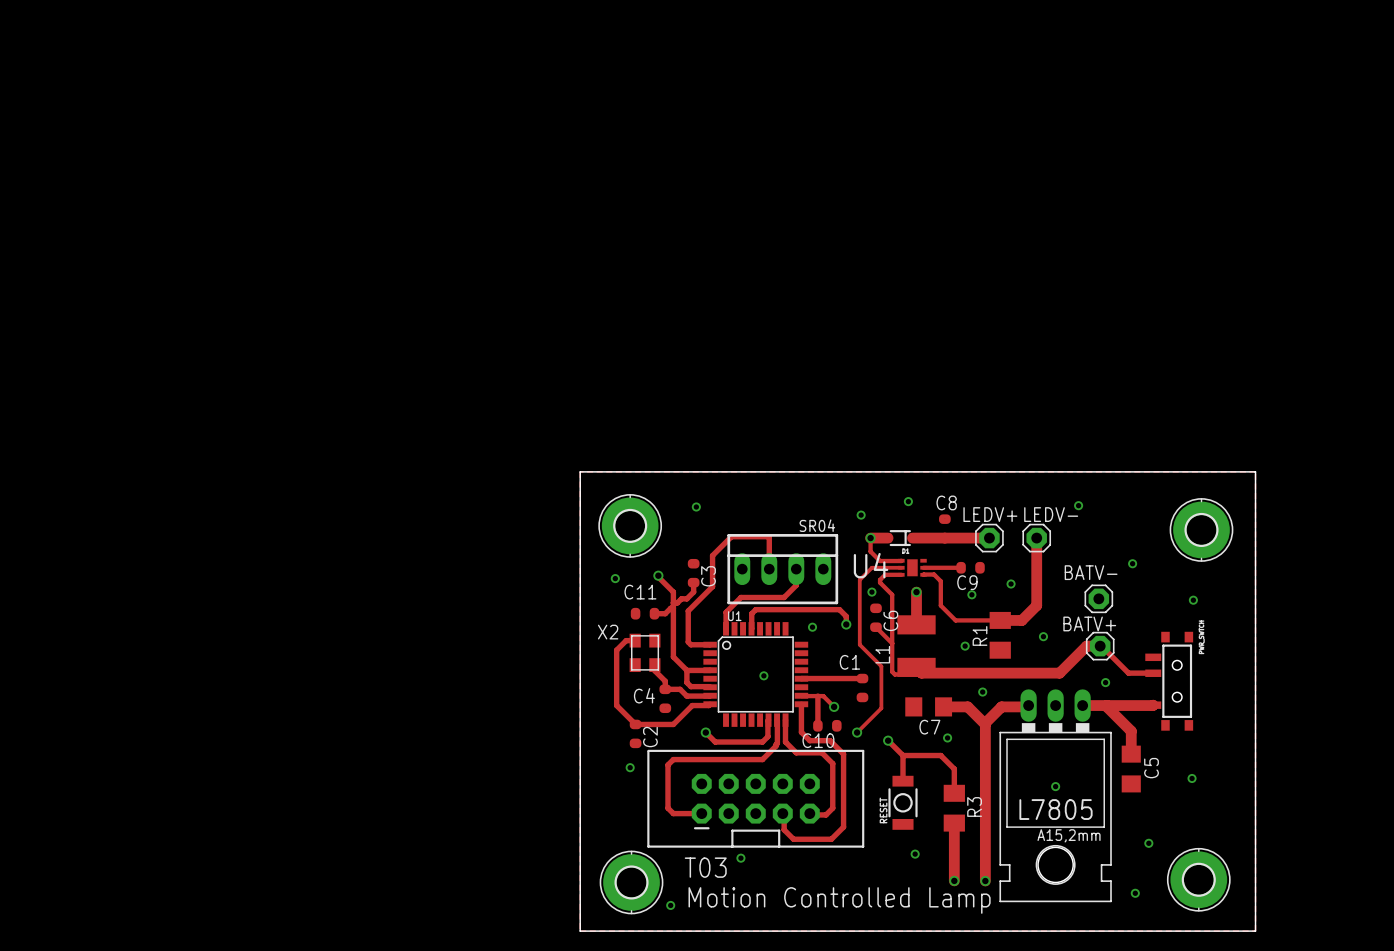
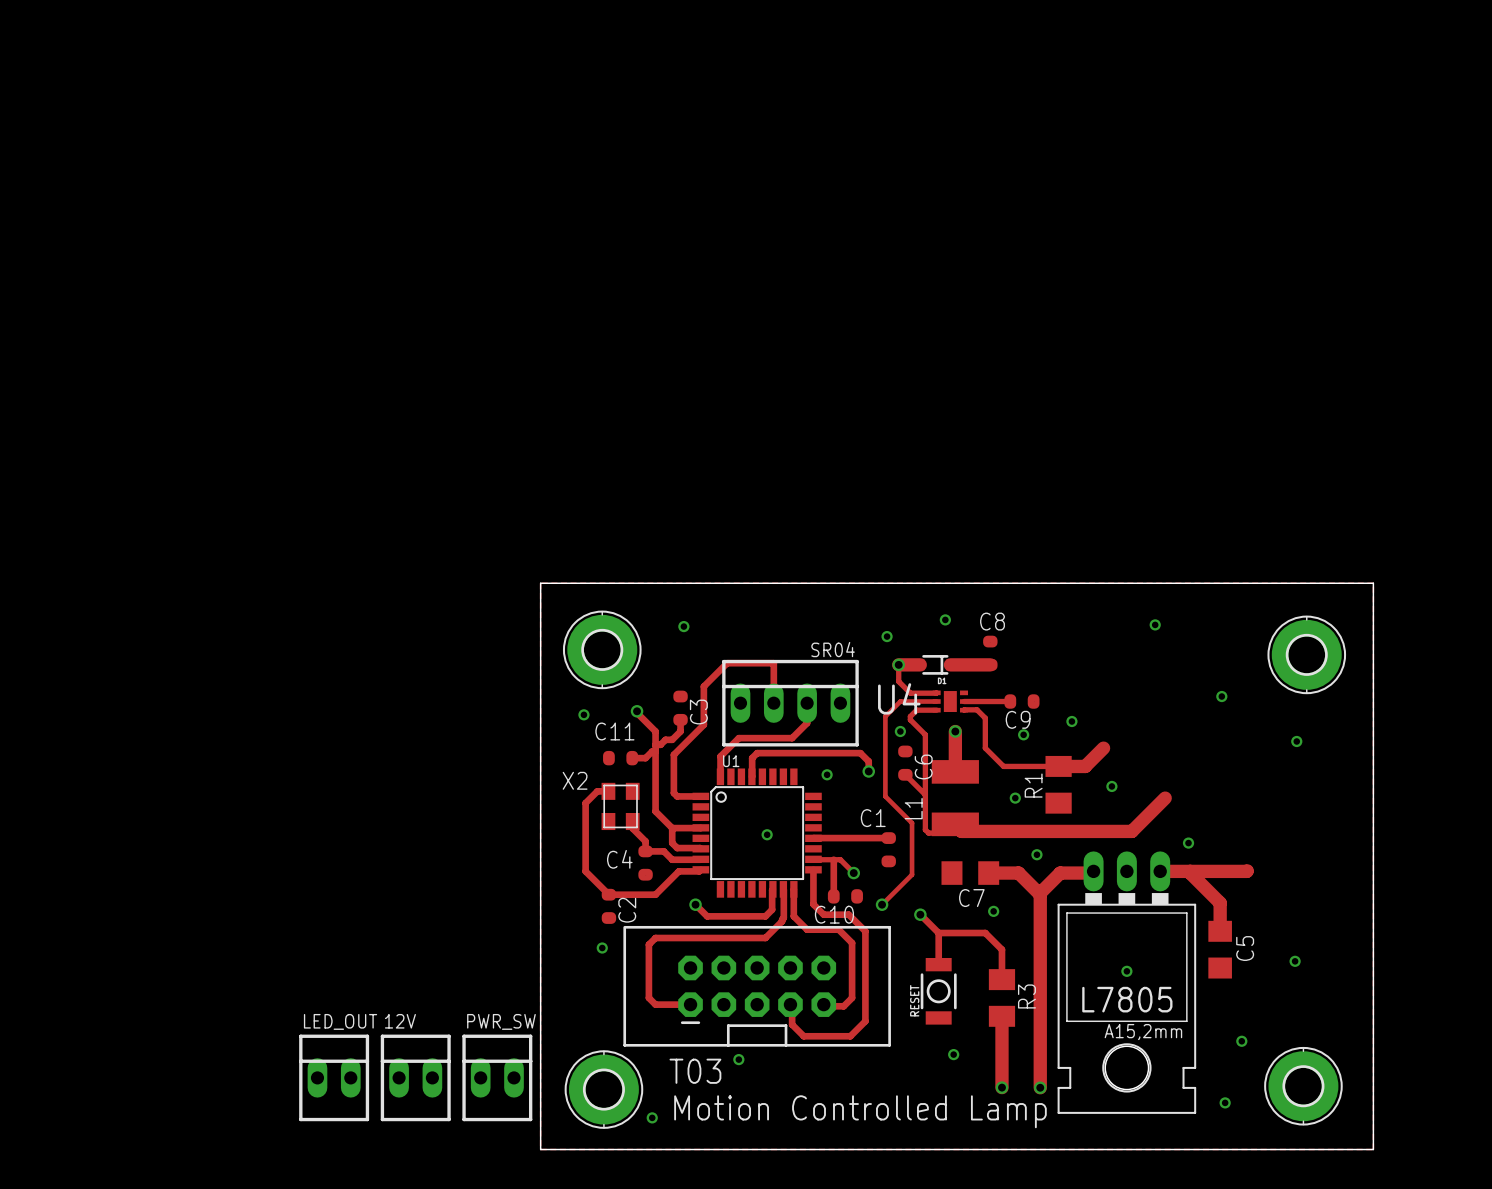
track: (944, 538) (989, 538) -> none
LEDV+: (989, 538) -> none
track: (1036, 538) (1036, 605) -> none
LEDV-: (1036, 538) -> none
BATV-: (1098, 598) -> none
track: (1086, 646) (1101, 646) (1128, 673) (1153, 673) -> none
BATV+: (1100, 646) -> none
part: (1169, 681) -> none
LED_OUT: none -> (334, 1077)
12V: none -> (415, 1077)
PWR_SW: none -> (497, 1077)

